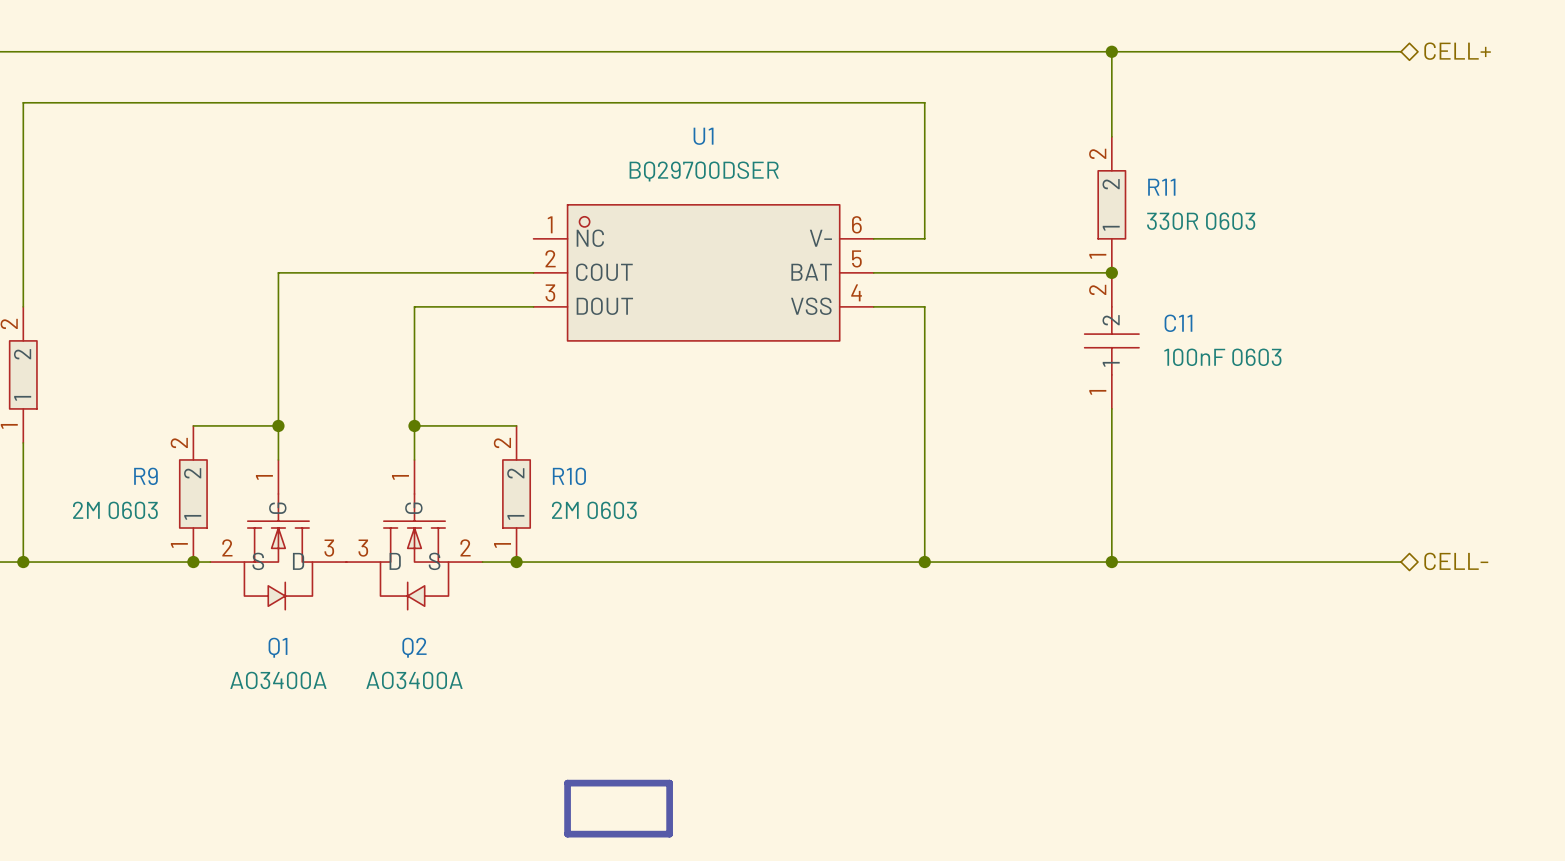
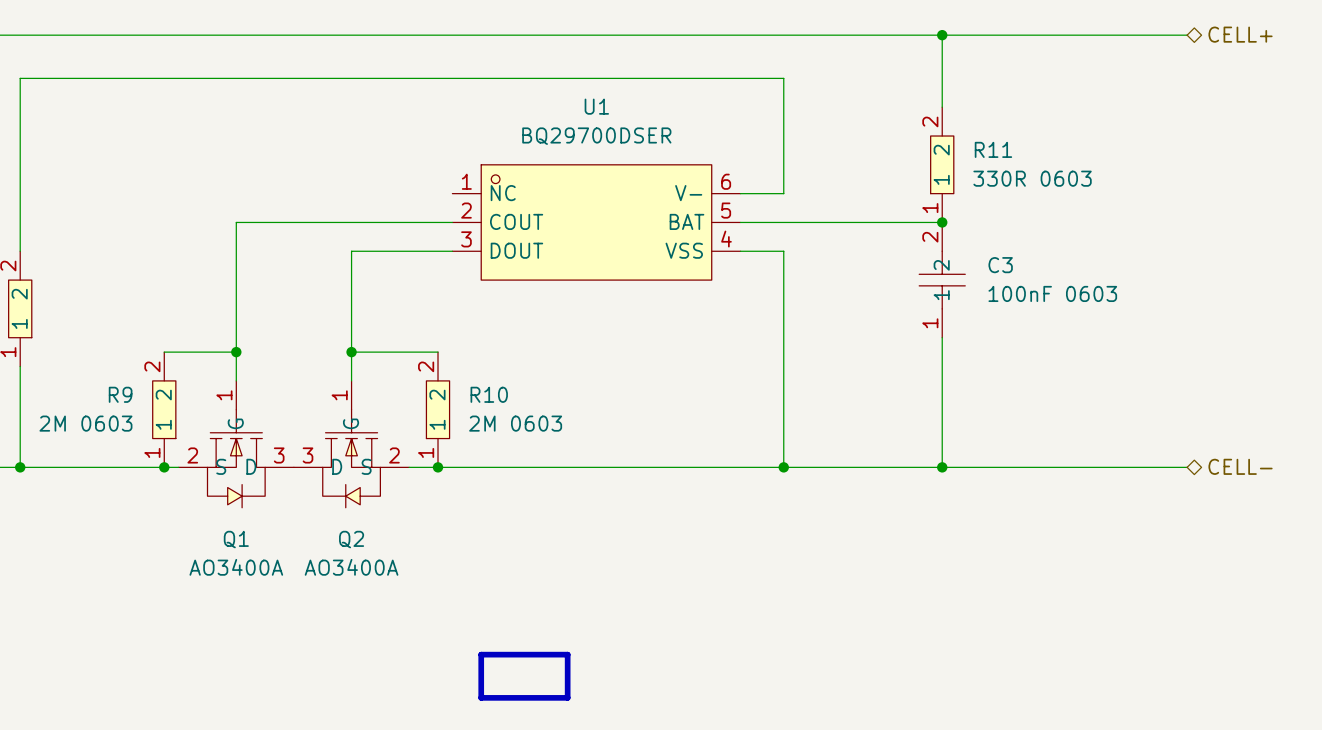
C11 name: C11 (1178, 323) -> C3 (1000, 265)

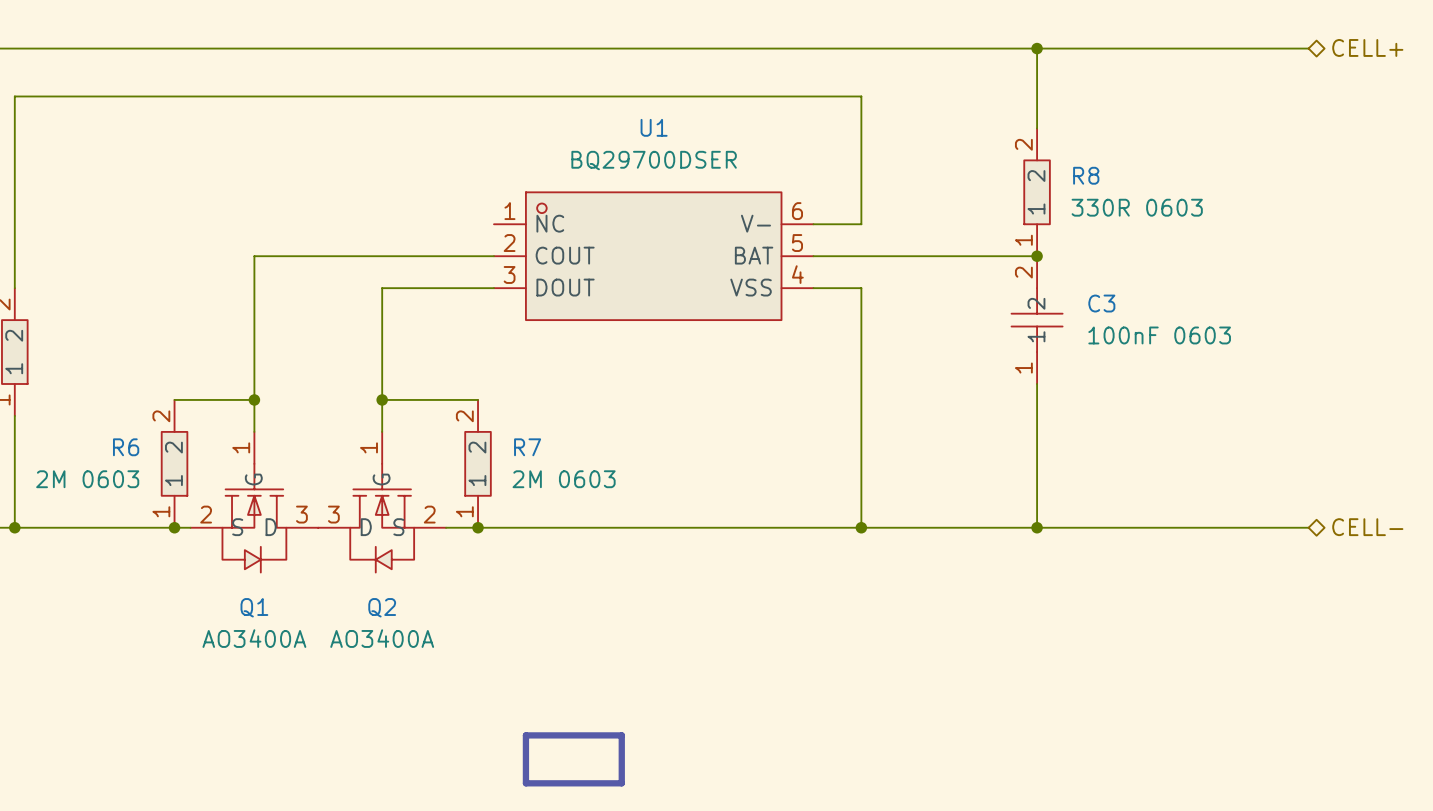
R11 name: R11 (993, 149) -> R8 (1086, 175)
R9 name: R9 (120, 394) -> R6 (126, 447)
R10 name: R10 (489, 394) -> R7 (527, 447)

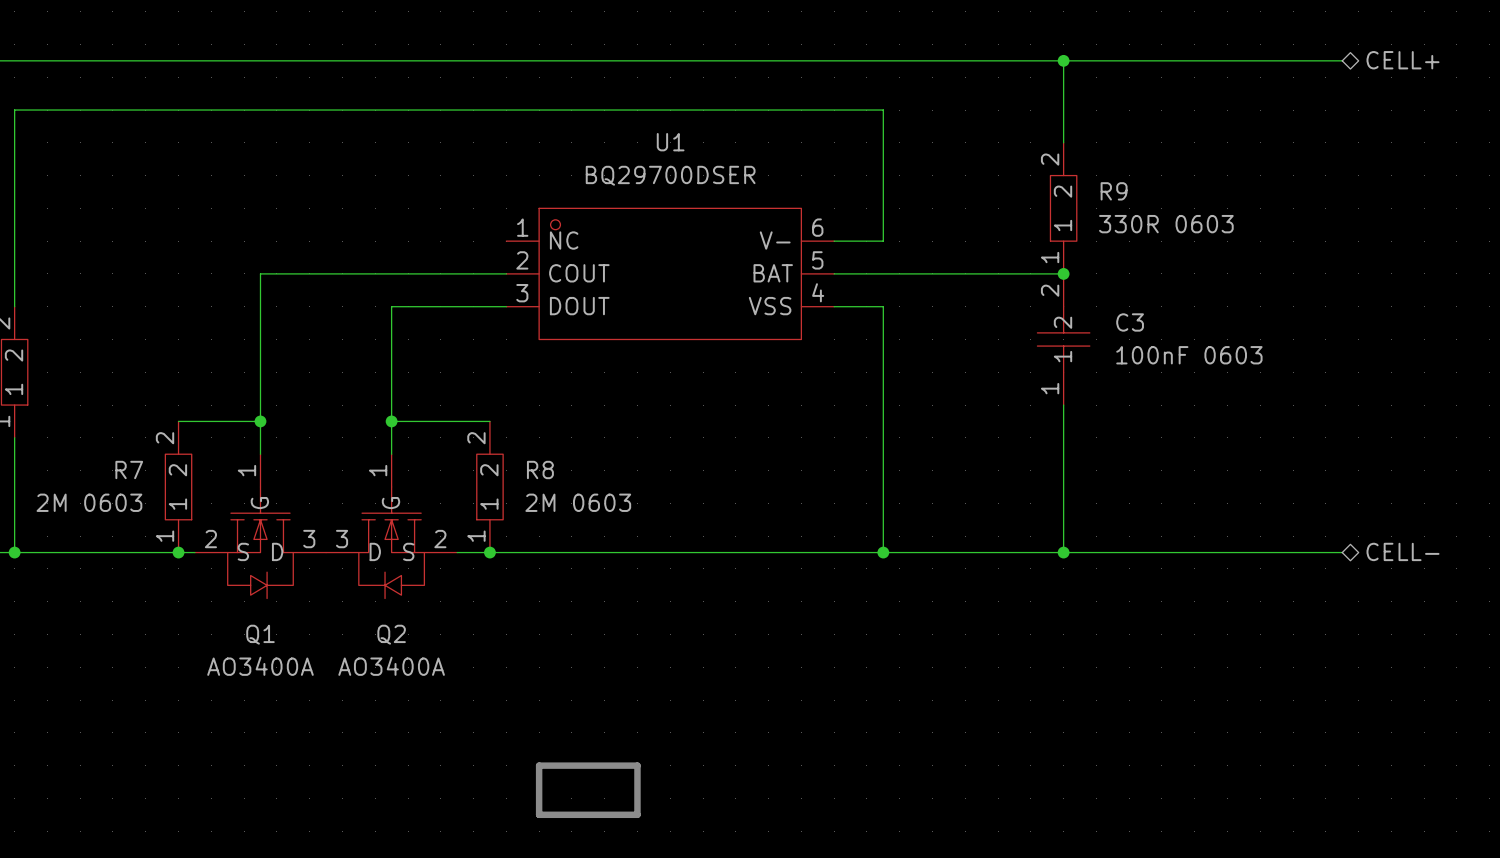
R8 name: R8 (1086, 175) -> R9 (1114, 191)
R6 name: R6 (126, 447) -> R7 (129, 469)
R7 name: R7 (527, 447) -> R8 (540, 469)

